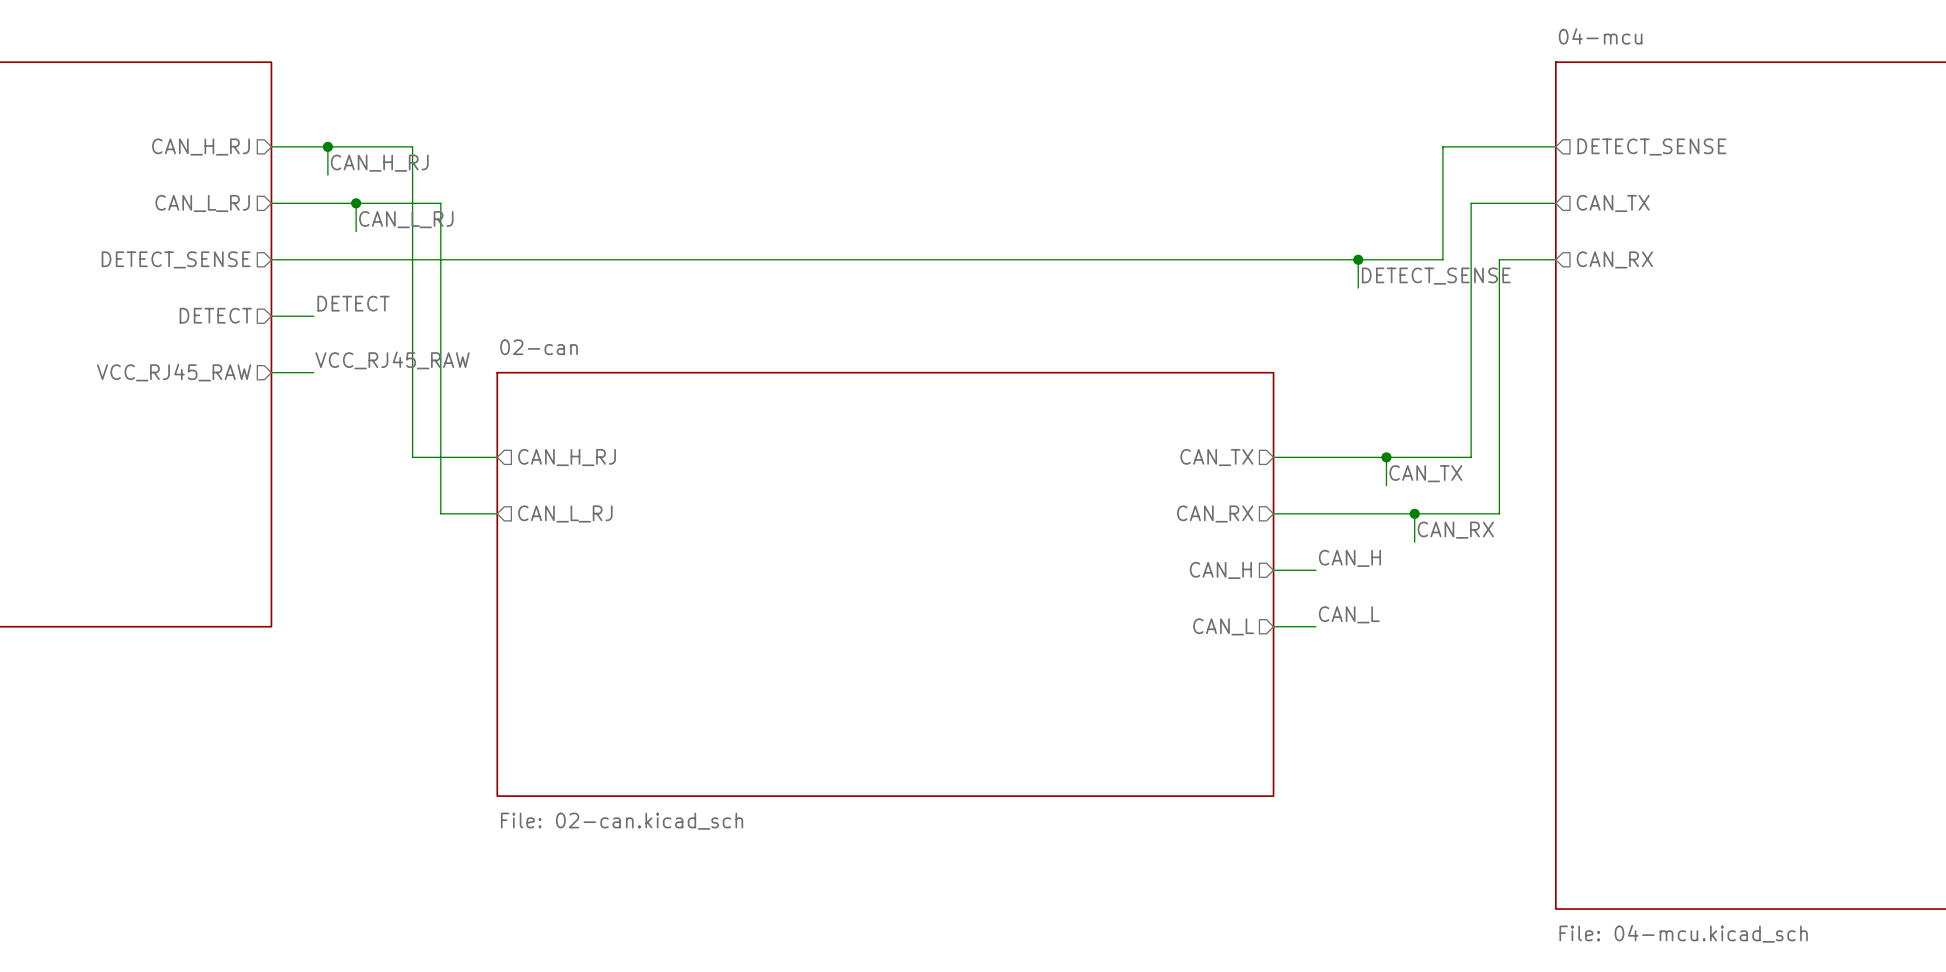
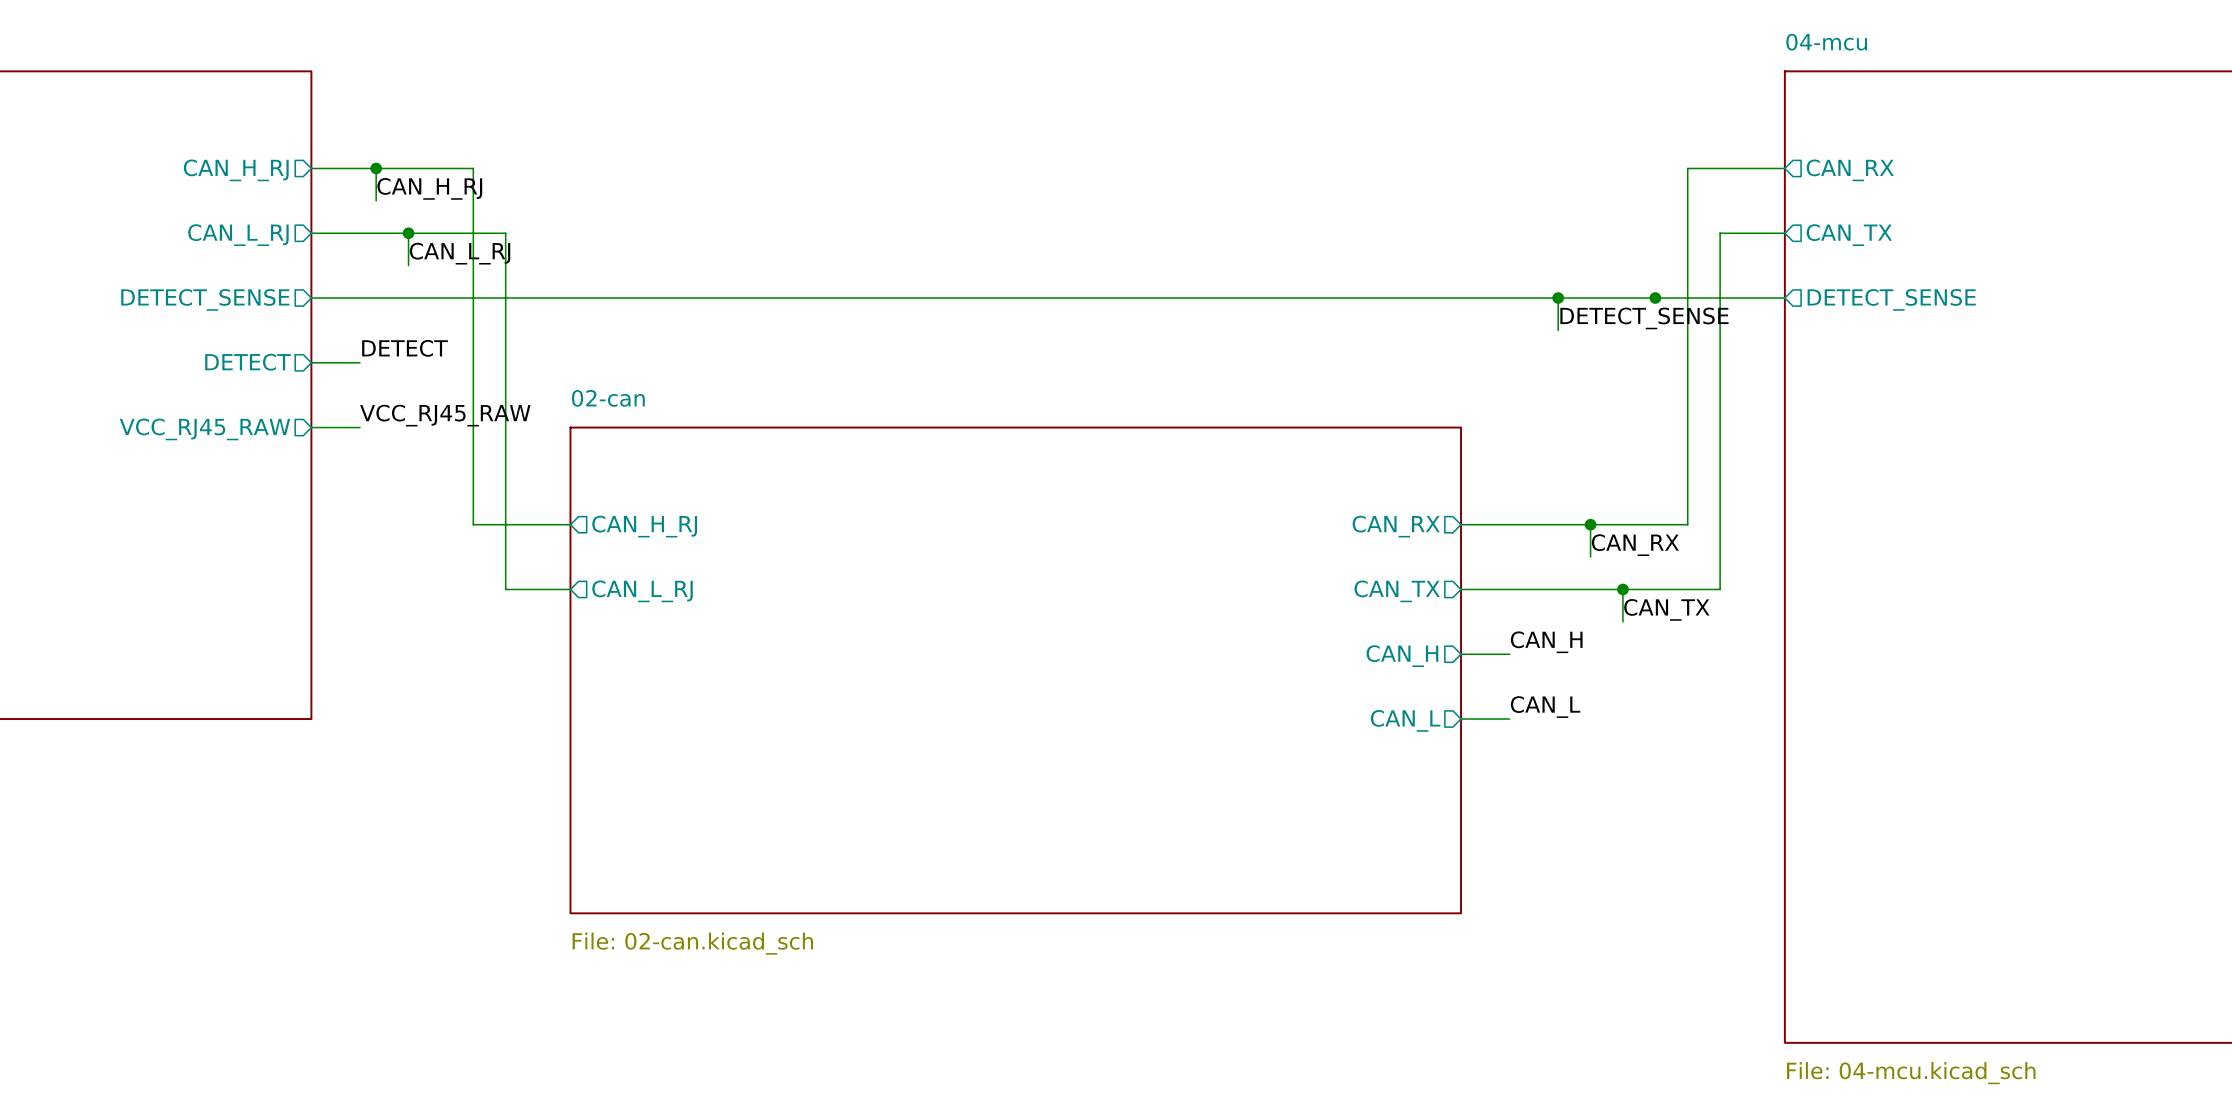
wire: (1471, 146) (1442, 146) (1442, 259) -> (1687, 168) (1687, 233)
sheet pin: DETECT_SENSE (1651, 147) -> CAN_RX (1850, 170)
wire: (1471, 203) (1499, 203) -> (1655, 298) (1720, 298) (1720, 233)
junction: none -> (1655, 298)
sheet pin: CAN_RX (1614, 259) -> DETECT_SENSE (1891, 299)
sheet pin: CAN_TX (1216, 457) -> CAN_RX (1396, 526)
label: CAN_TX (1425, 473) -> CAN_RX (1635, 545)
sheet pin: CAN_RX (1215, 513) -> CAN_TX (1397, 591)
label: CAN_RX (1455, 530) -> CAN_TX (1666, 609)

